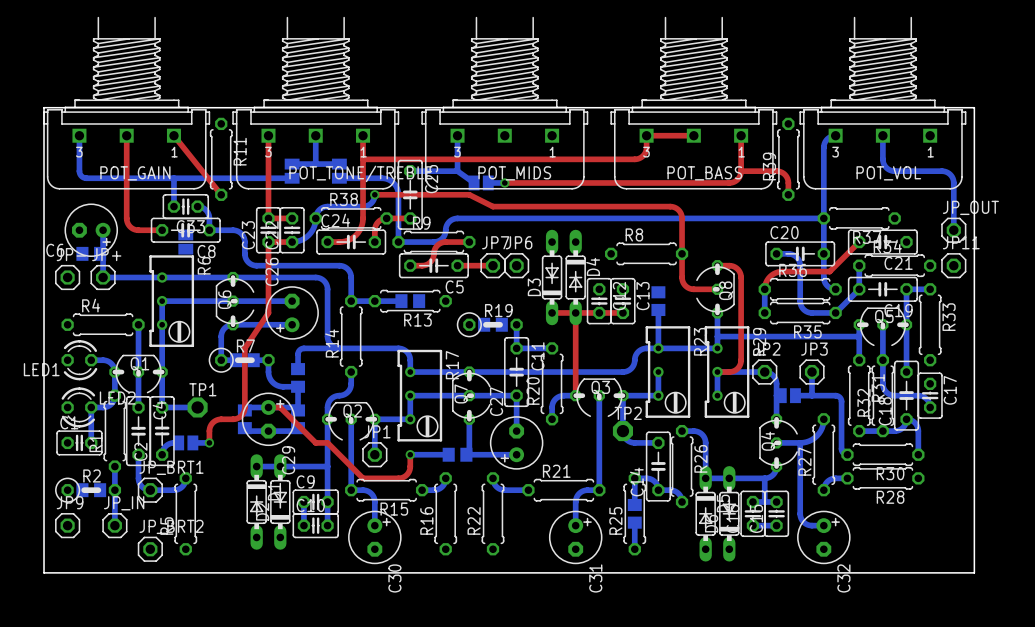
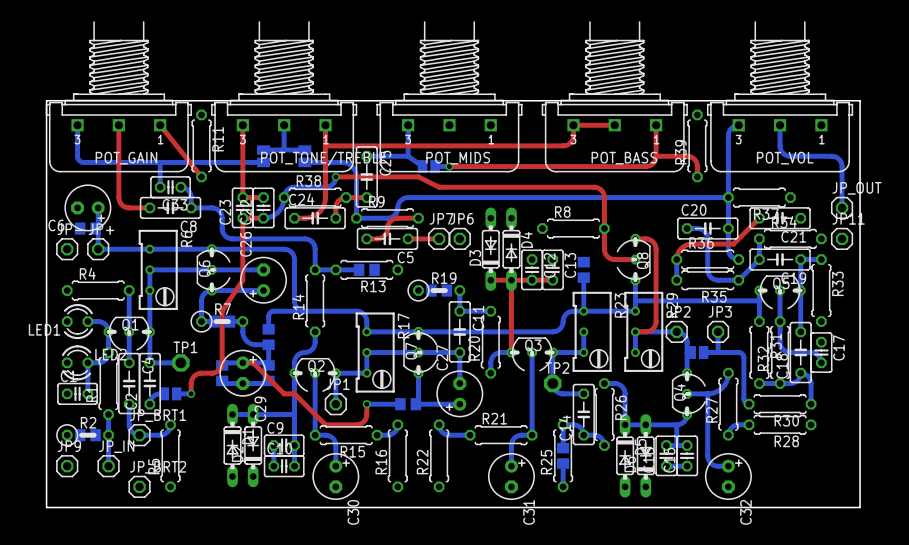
part: (185, 242) -> none

